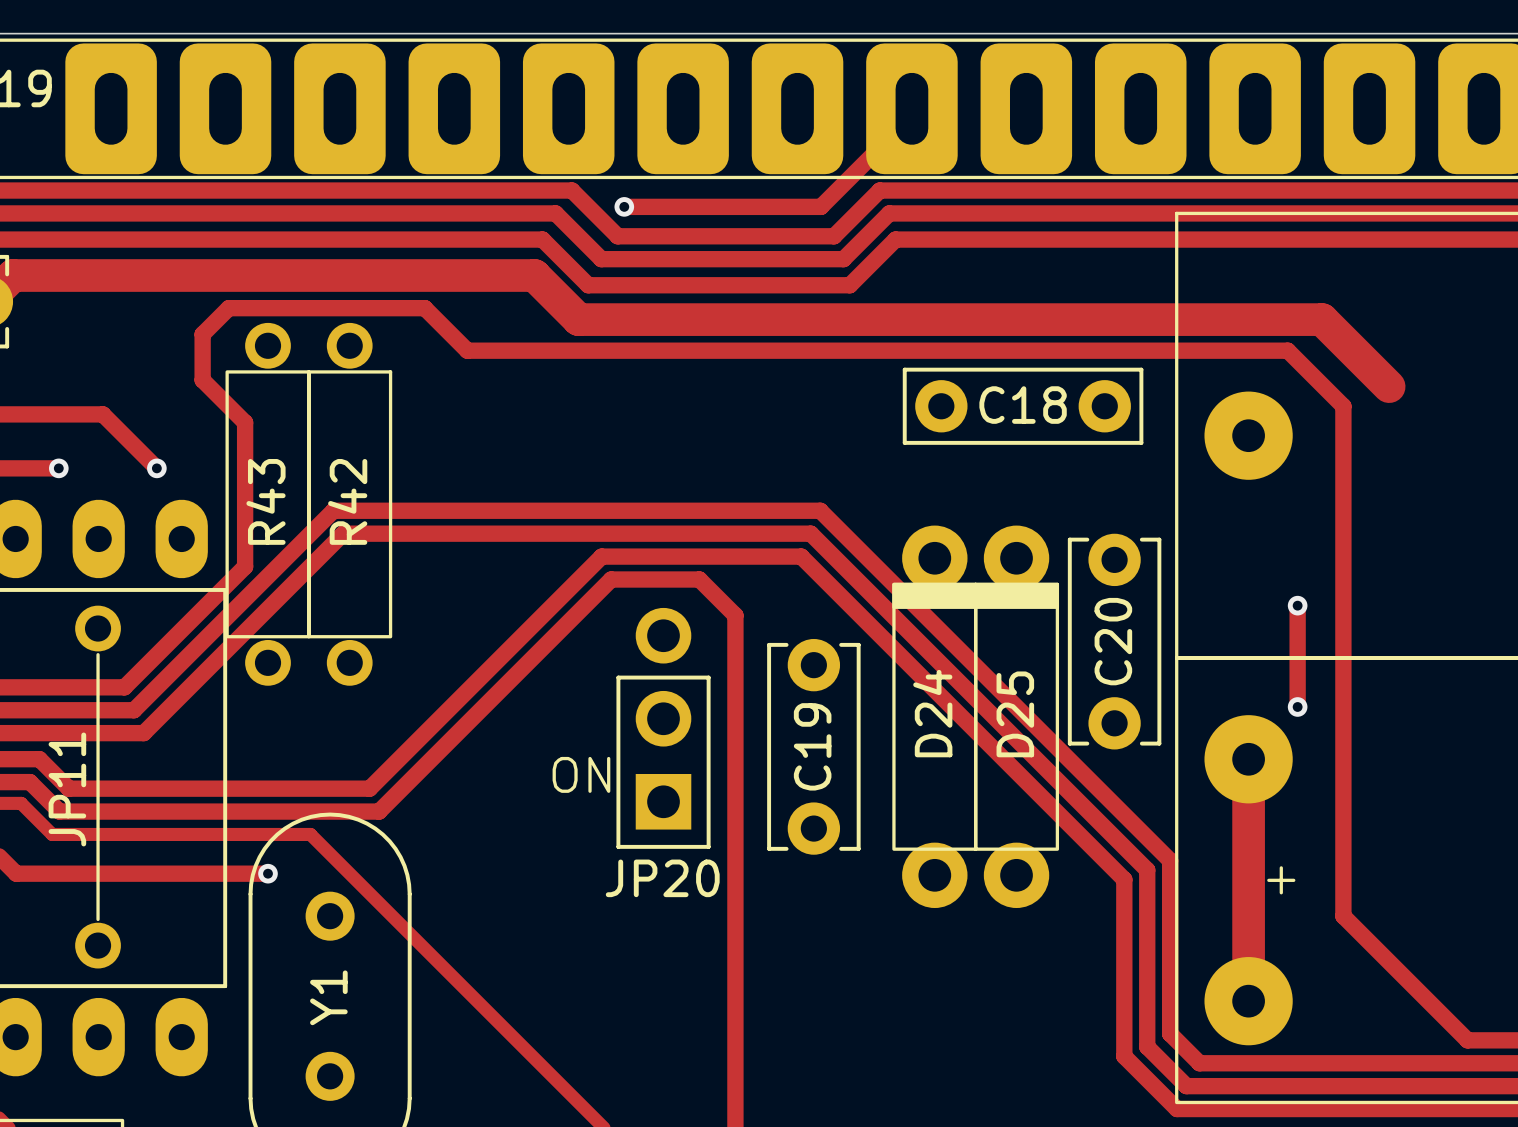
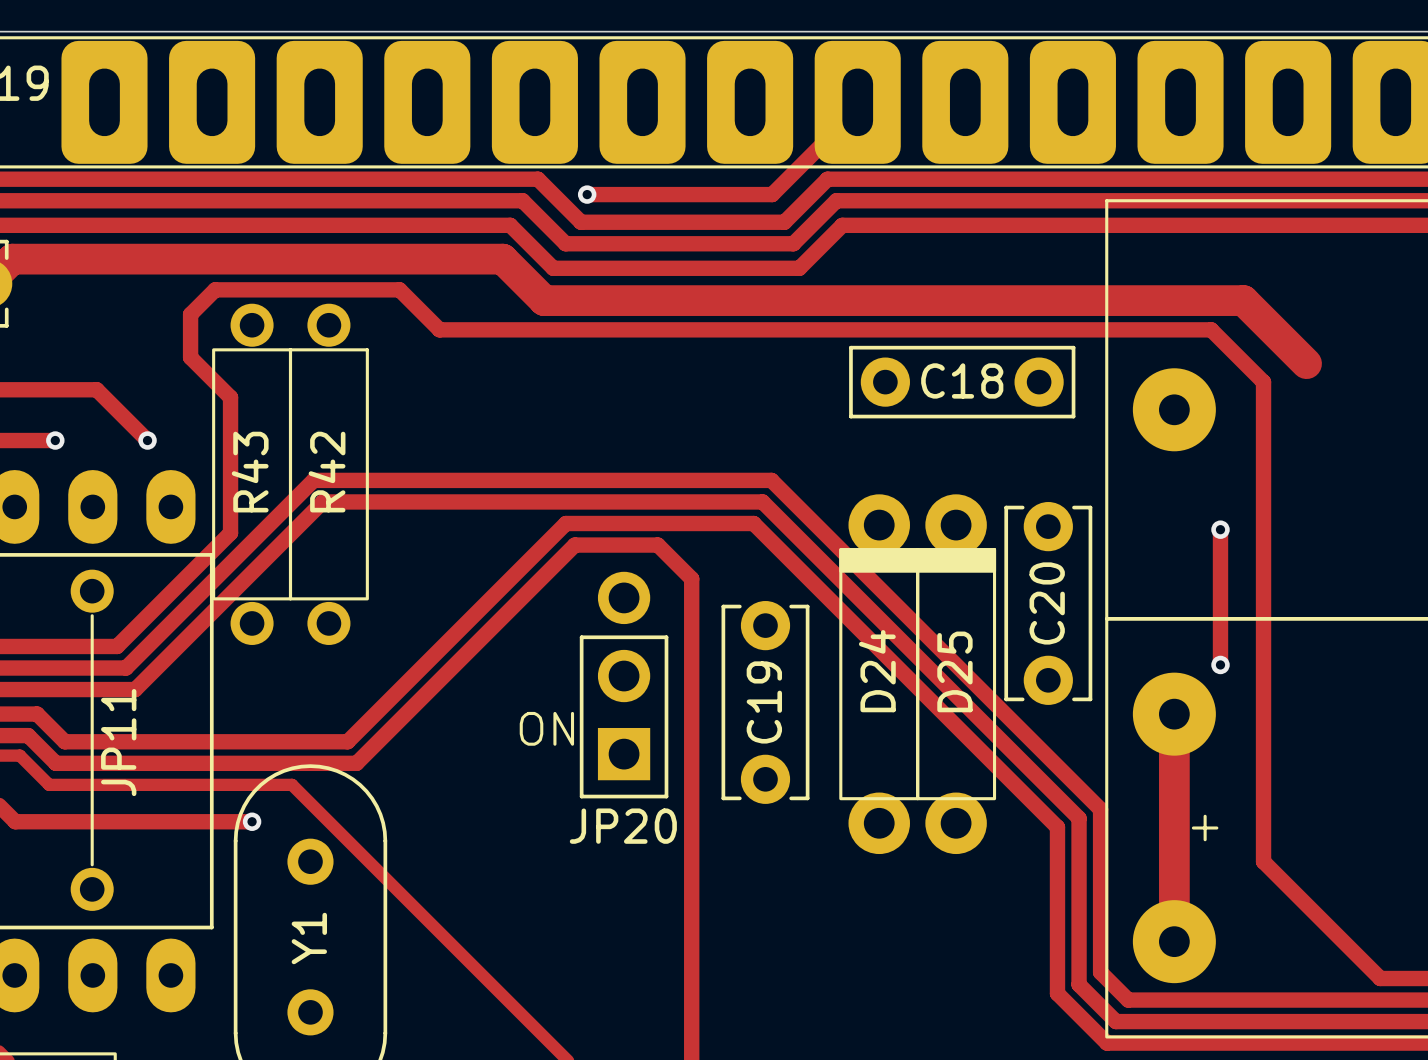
track: none -> (1220, 529) (1220, 569)
via position: (1297, 605) -> (1220, 529)
JP11 name position: JP11 (67, 789) -> JP11 (118, 742)

